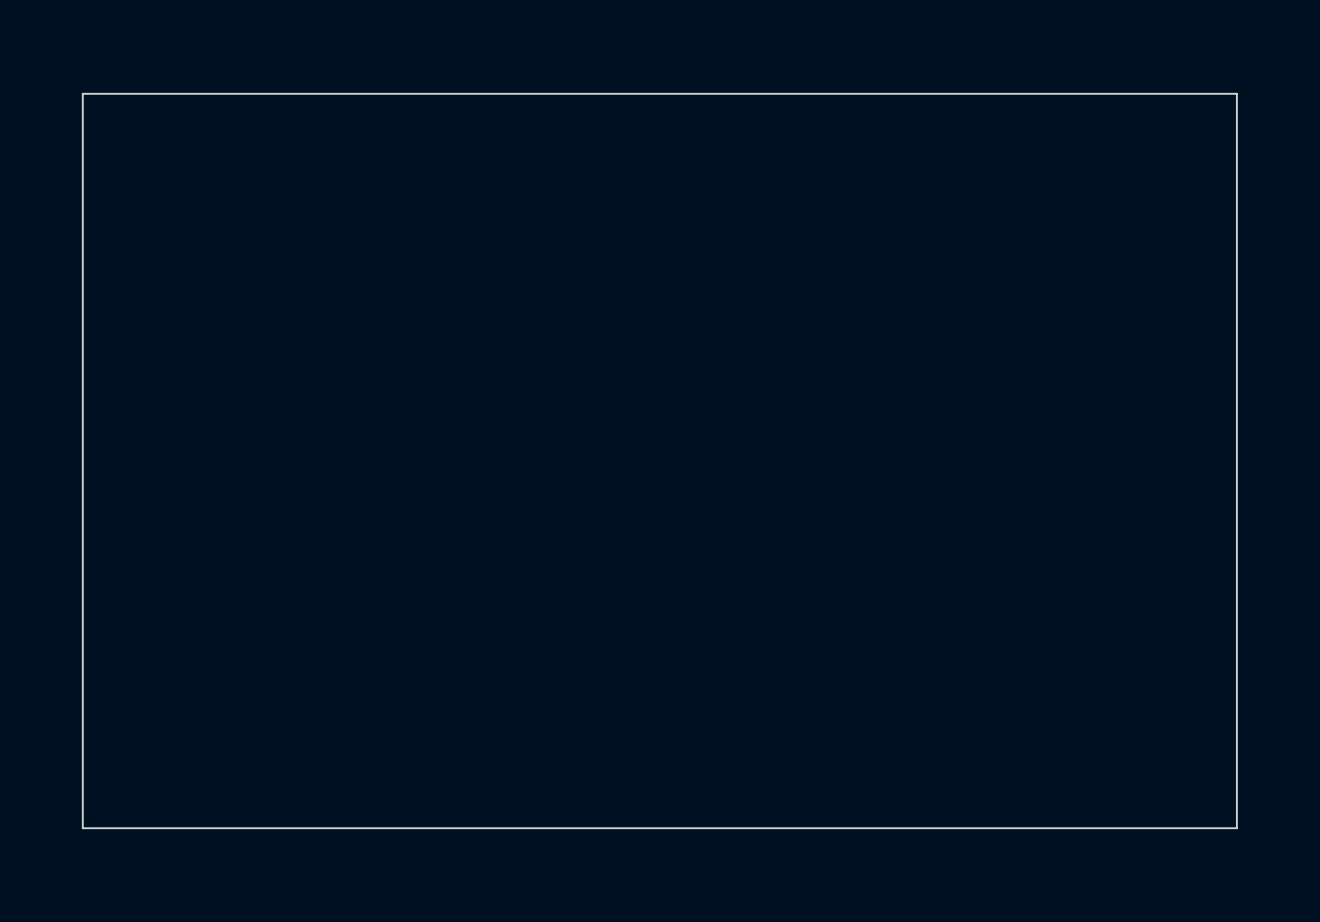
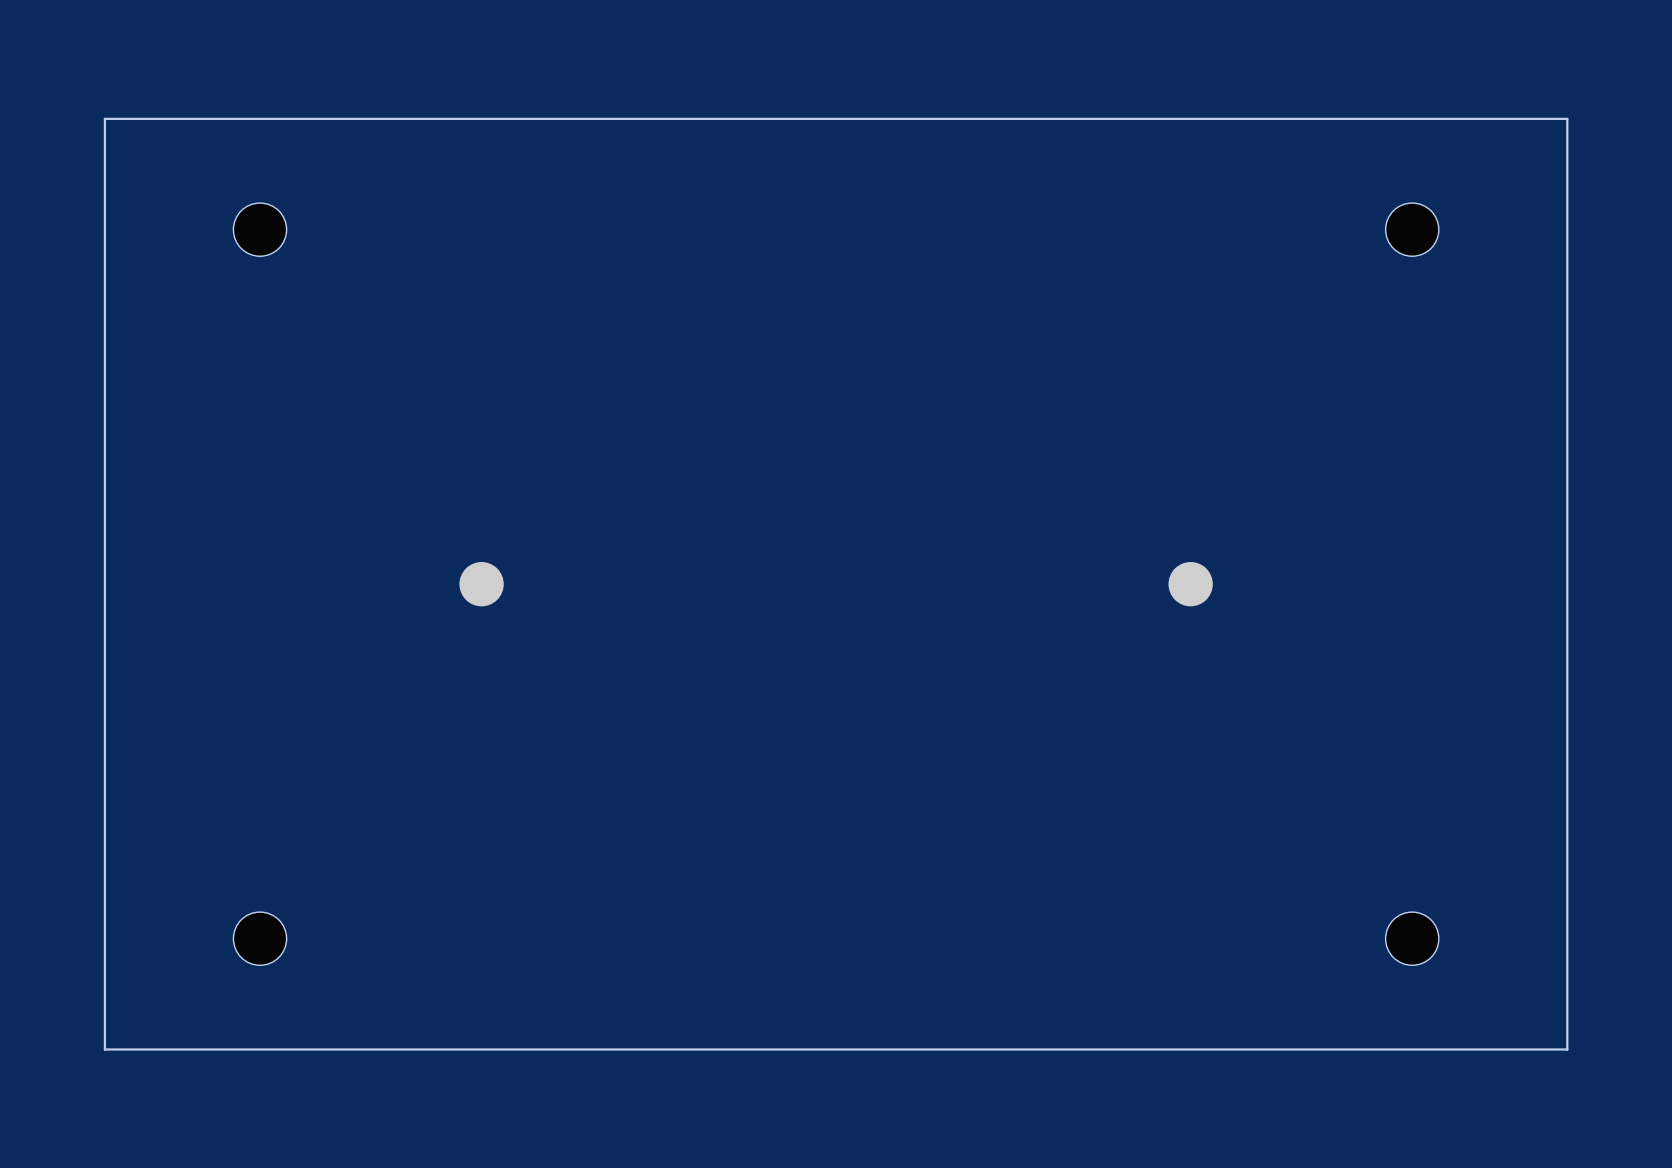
part: none -> (260, 229)
part: none -> (1412, 229)
part: none -> (481, 584)
part: none -> (1190, 584)
part: none -> (260, 938)
part: none -> (1412, 938)

